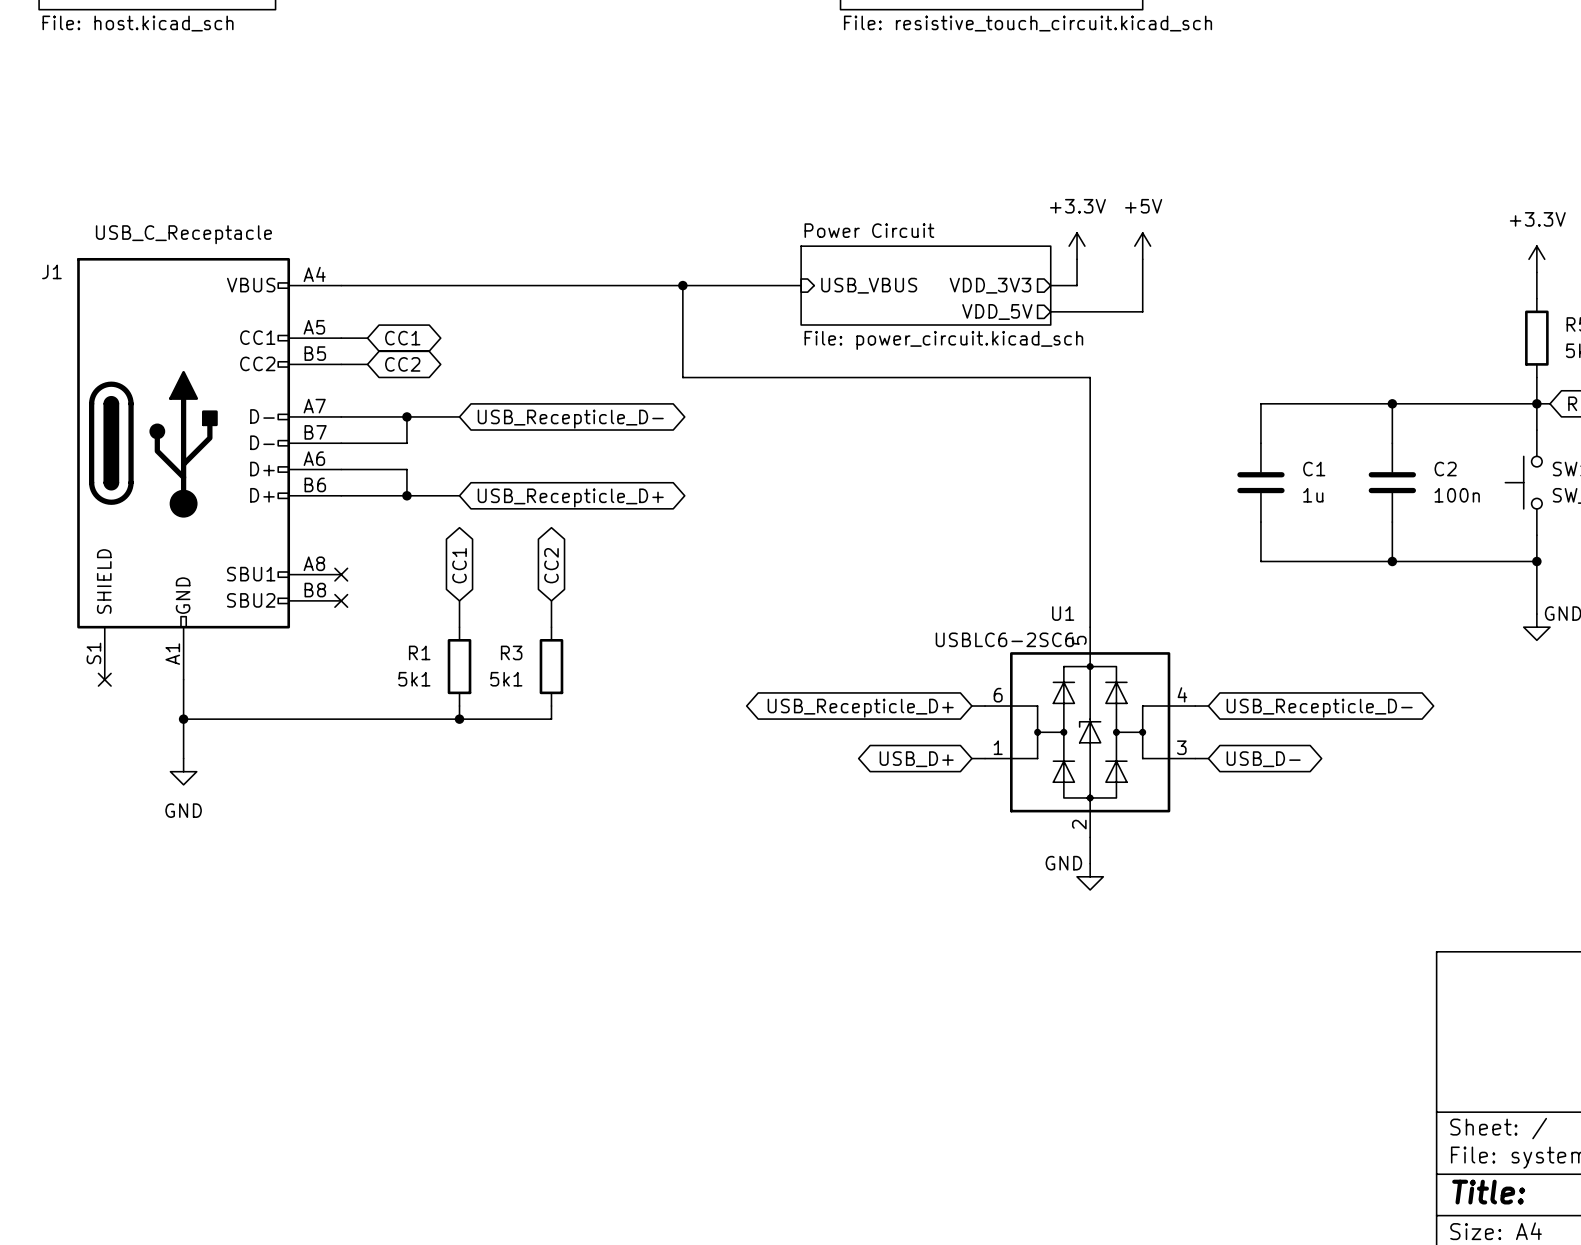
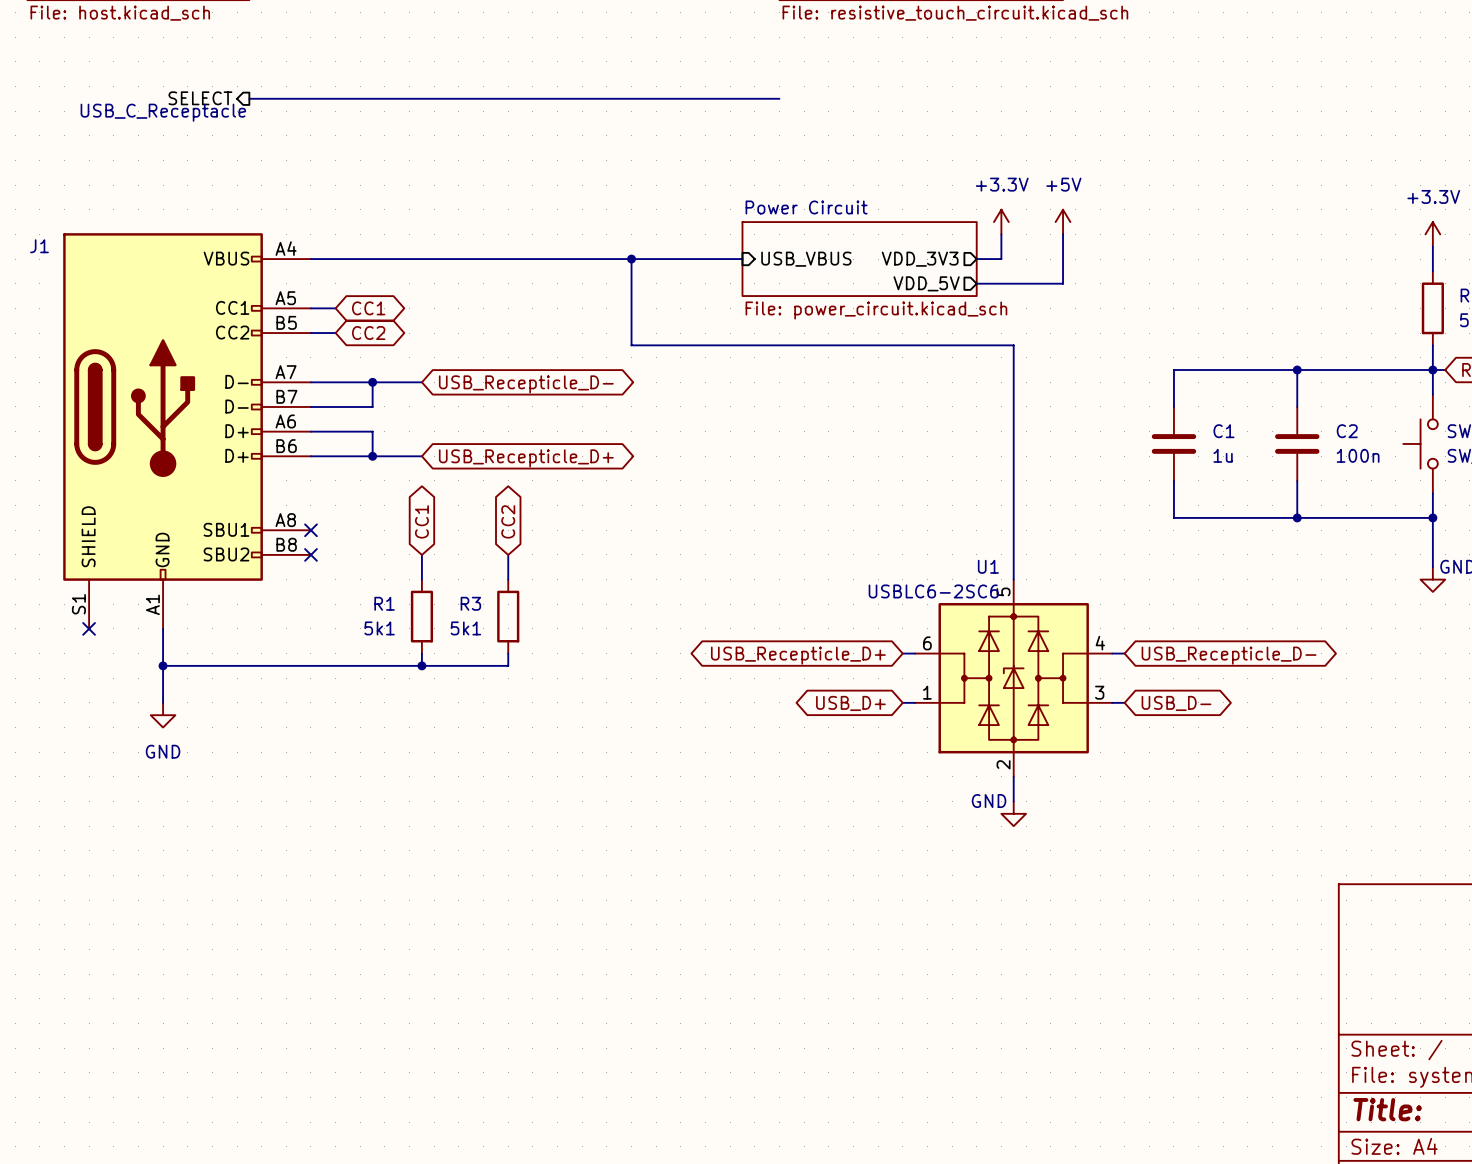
sheet pin: none -> SELECT (200, 98)
wire: none -> (249, 98) (779, 98)
J1 value position: USB_C_Receptacle (183, 234) -> USB_C_Receptacle (163, 112)

